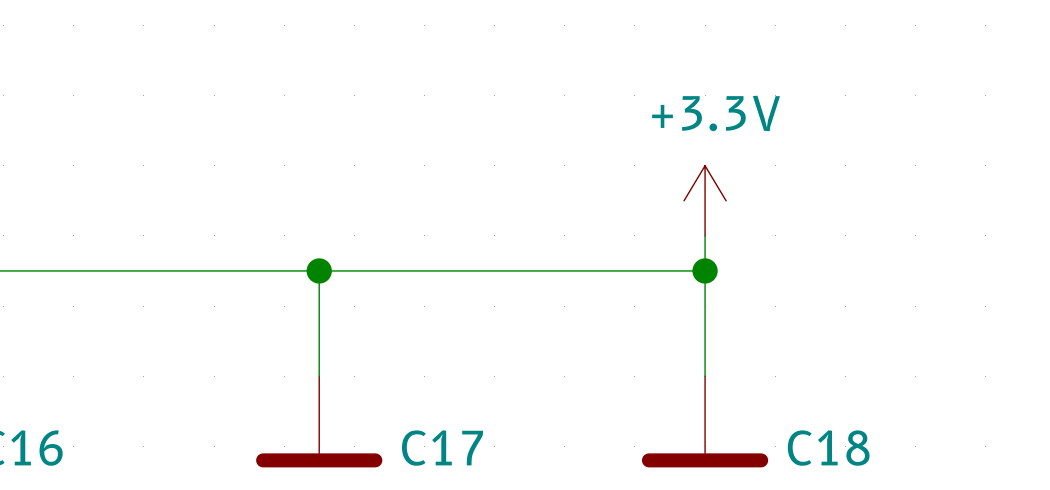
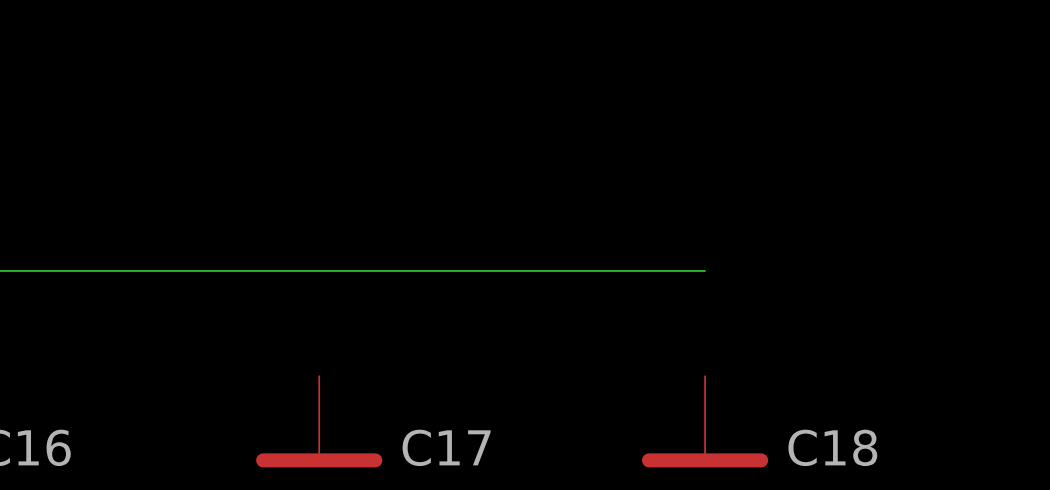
power symbol: +3.3V (705, 200) -> none
wire: (705, 235) (705, 376) -> none
wire: (319, 270) (319, 376) -> none
junction: (319, 270) -> none
junction: (705, 270) -> none

